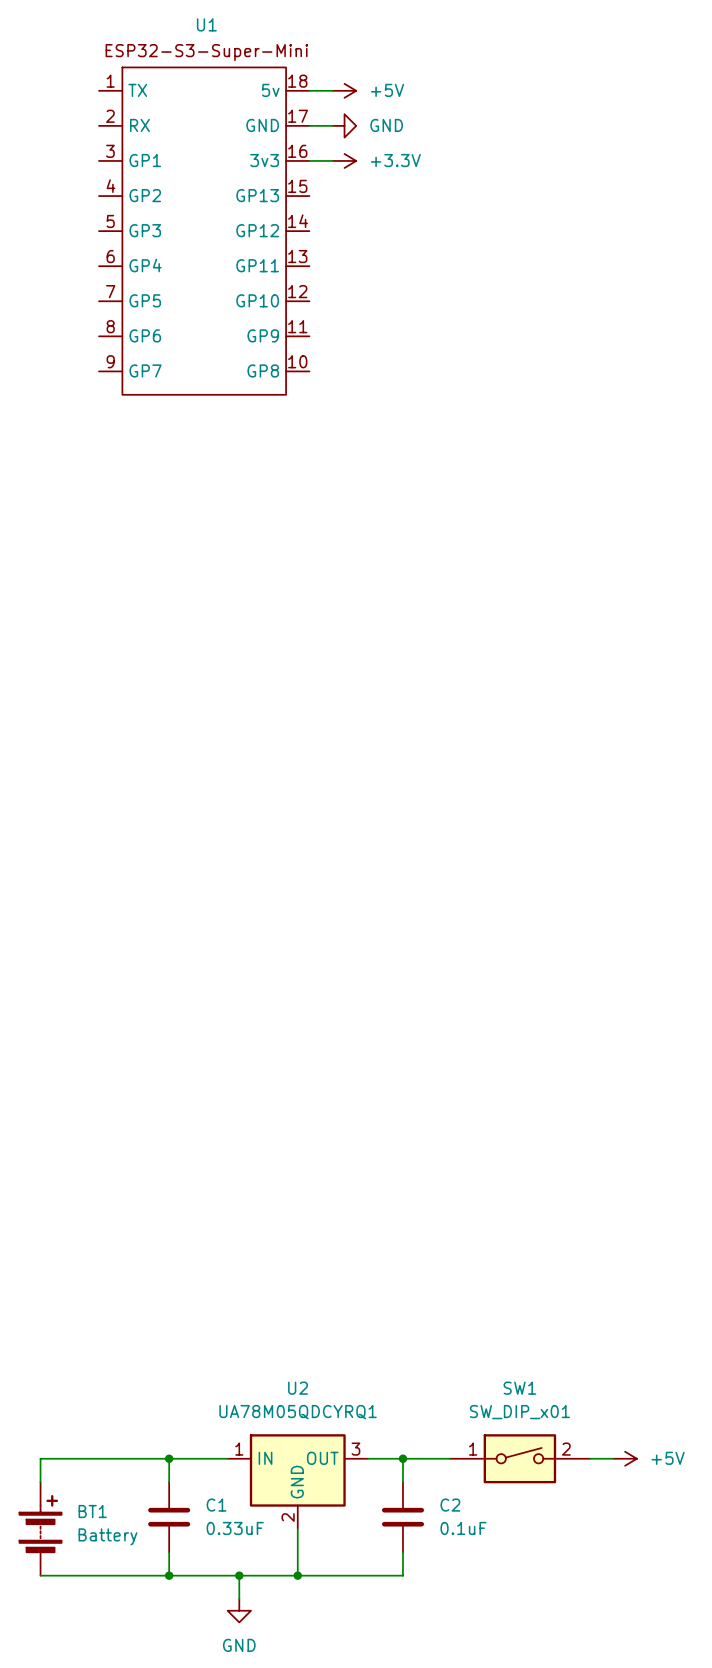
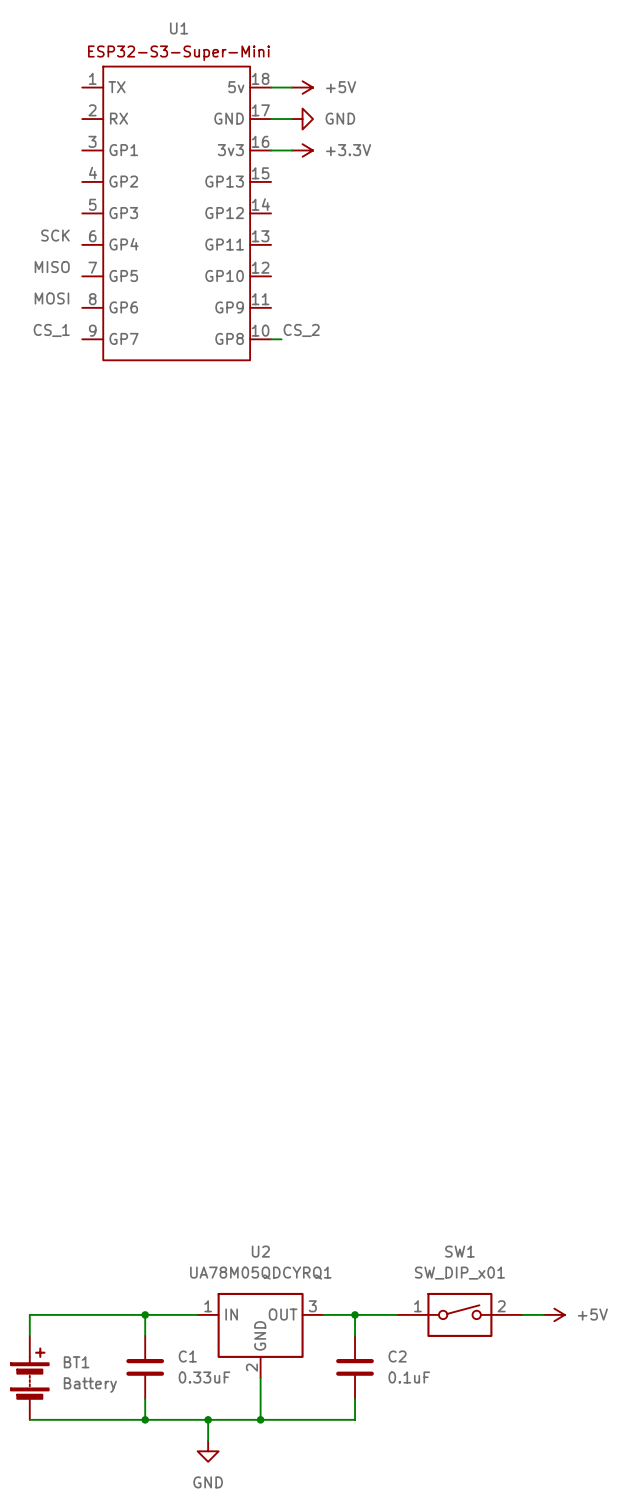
label: none -> SCK (55, 235)
label: none -> MISO (52, 267)
label: none -> MOSI (51, 298)
label: none -> CS_1 (51, 330)
label: none -> CS_2 (301, 330)
wire: none -> (271, 339) (281, 339)

